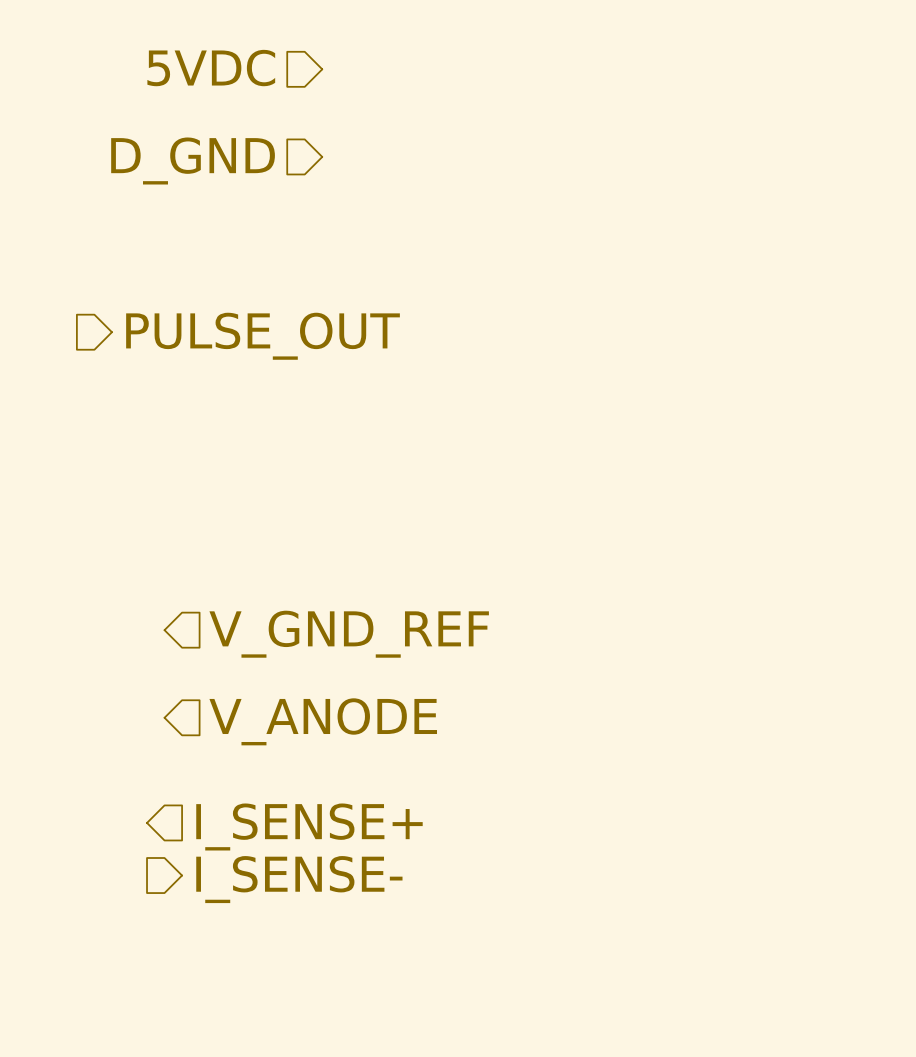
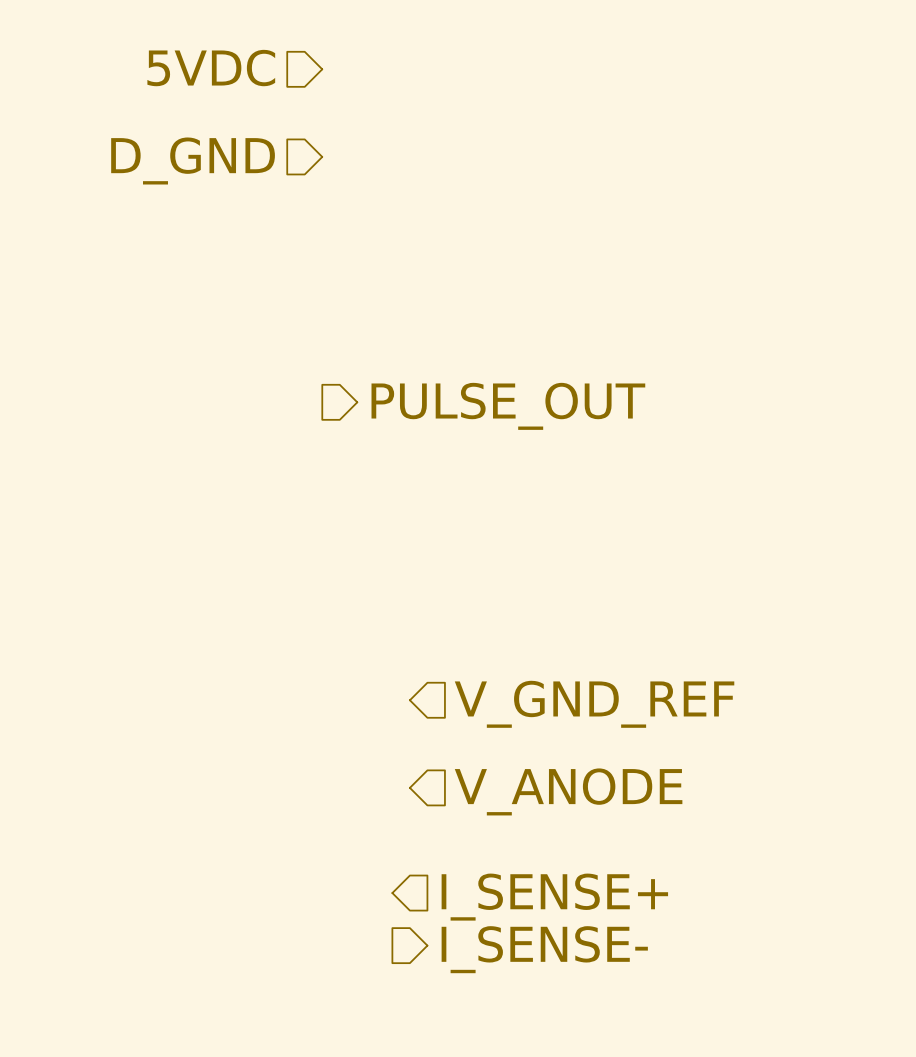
hierarchical label position: PULSE_OUT (263, 336) -> PULSE_OUT (508, 406)
hierarchical label position: V_GND_REF (349, 634) -> V_GND_REF (594, 704)
hierarchical label position: V_ANODE (323, 721) -> V_ANODE (568, 791)
hierarchical label position: I_SENSE+ (309, 826) -> I_SENSE+ (554, 897)
hierarchical label position: I_SENSE- (299, 879) -> I_SENSE- (544, 949)

